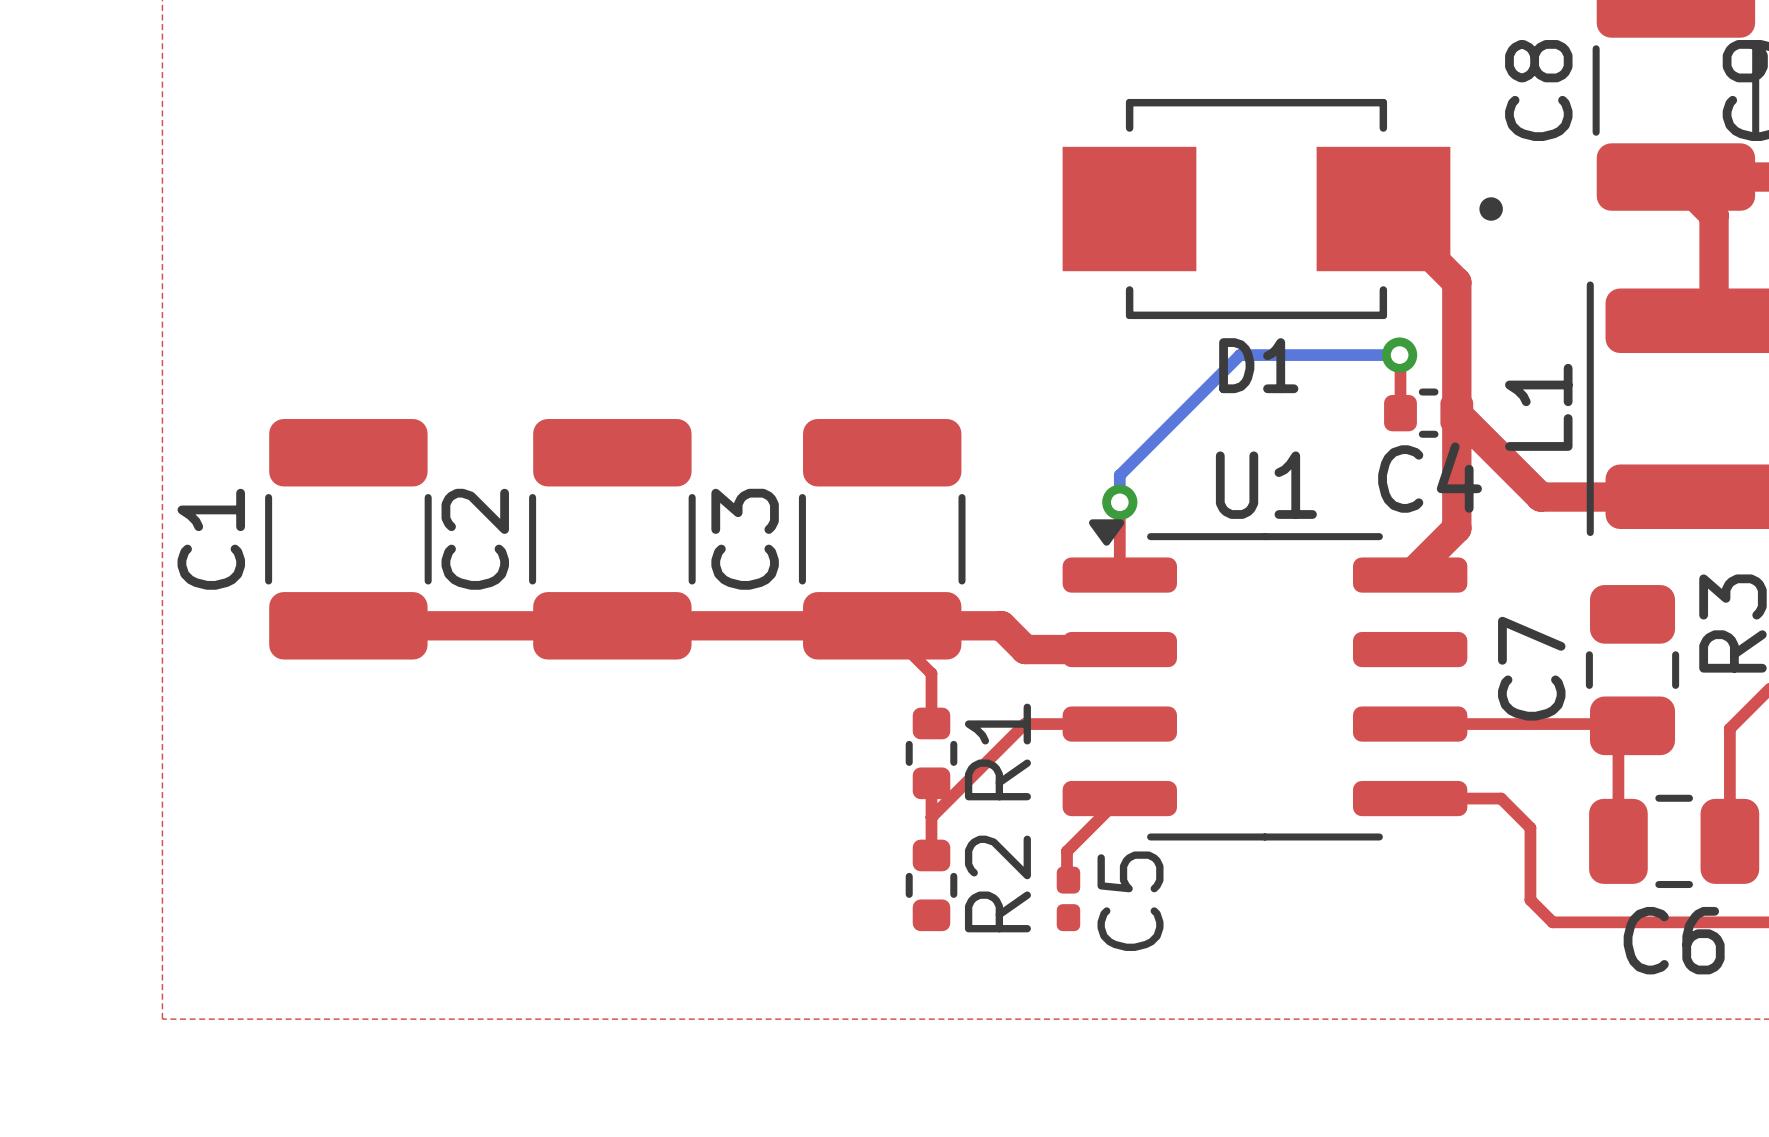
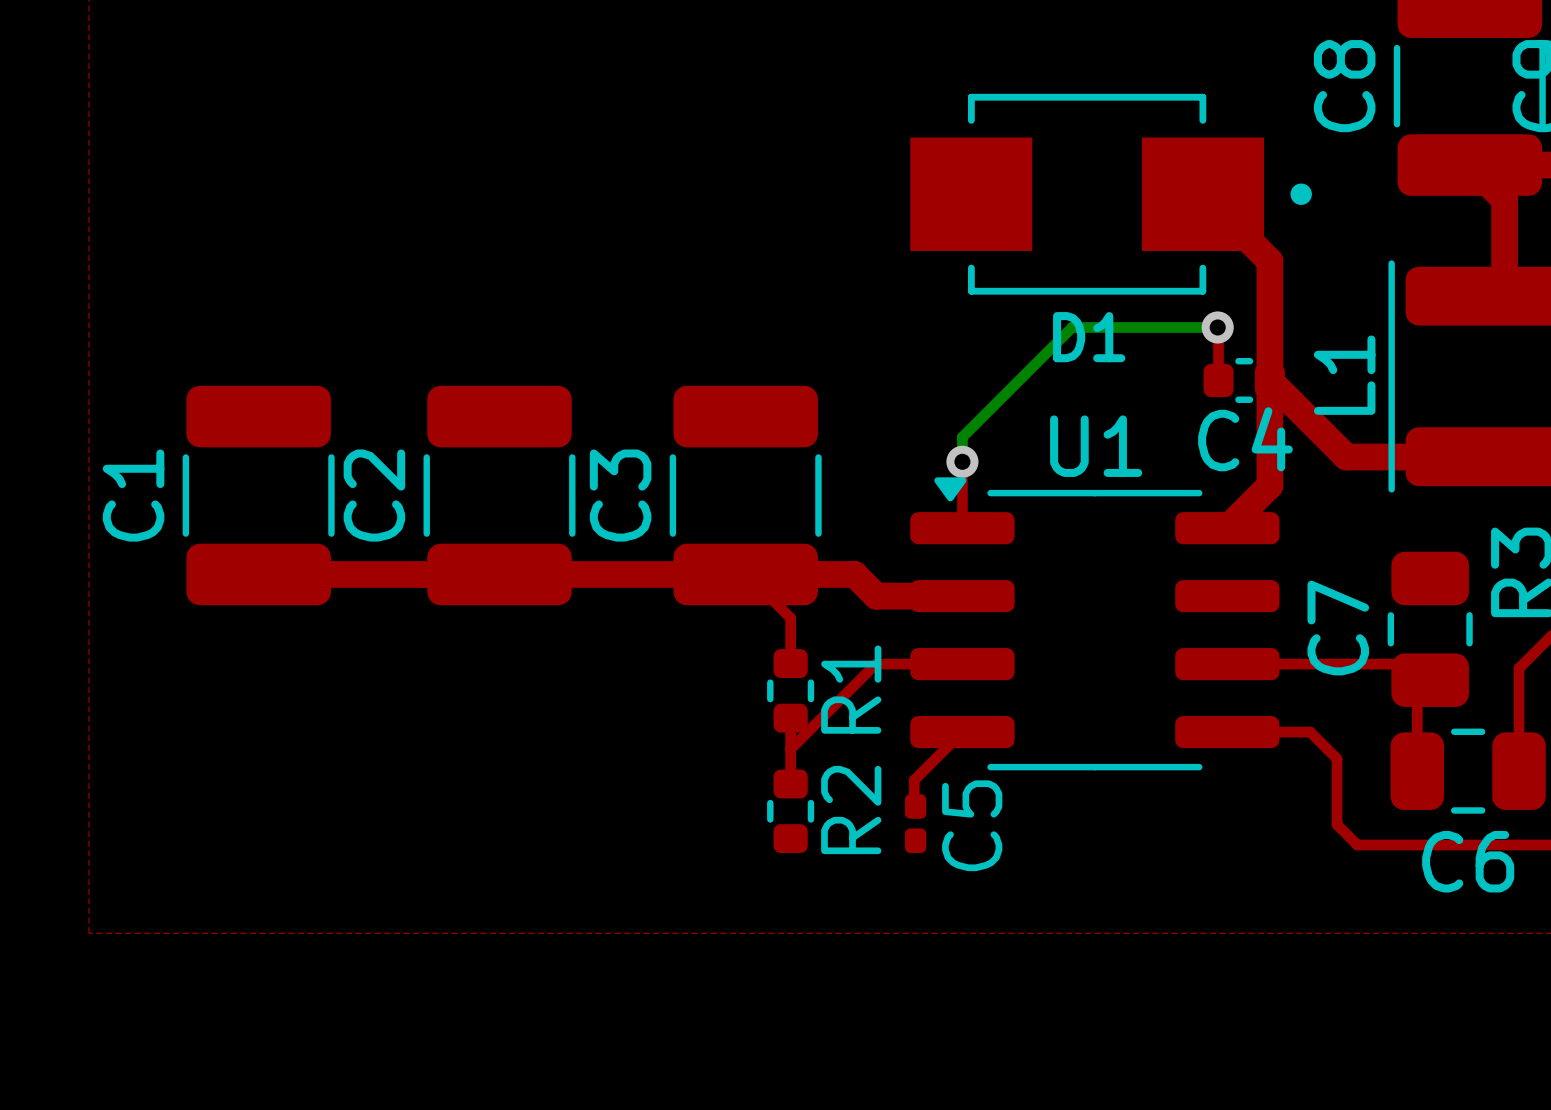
C7 position: (1632, 670) -> (1430, 629)

